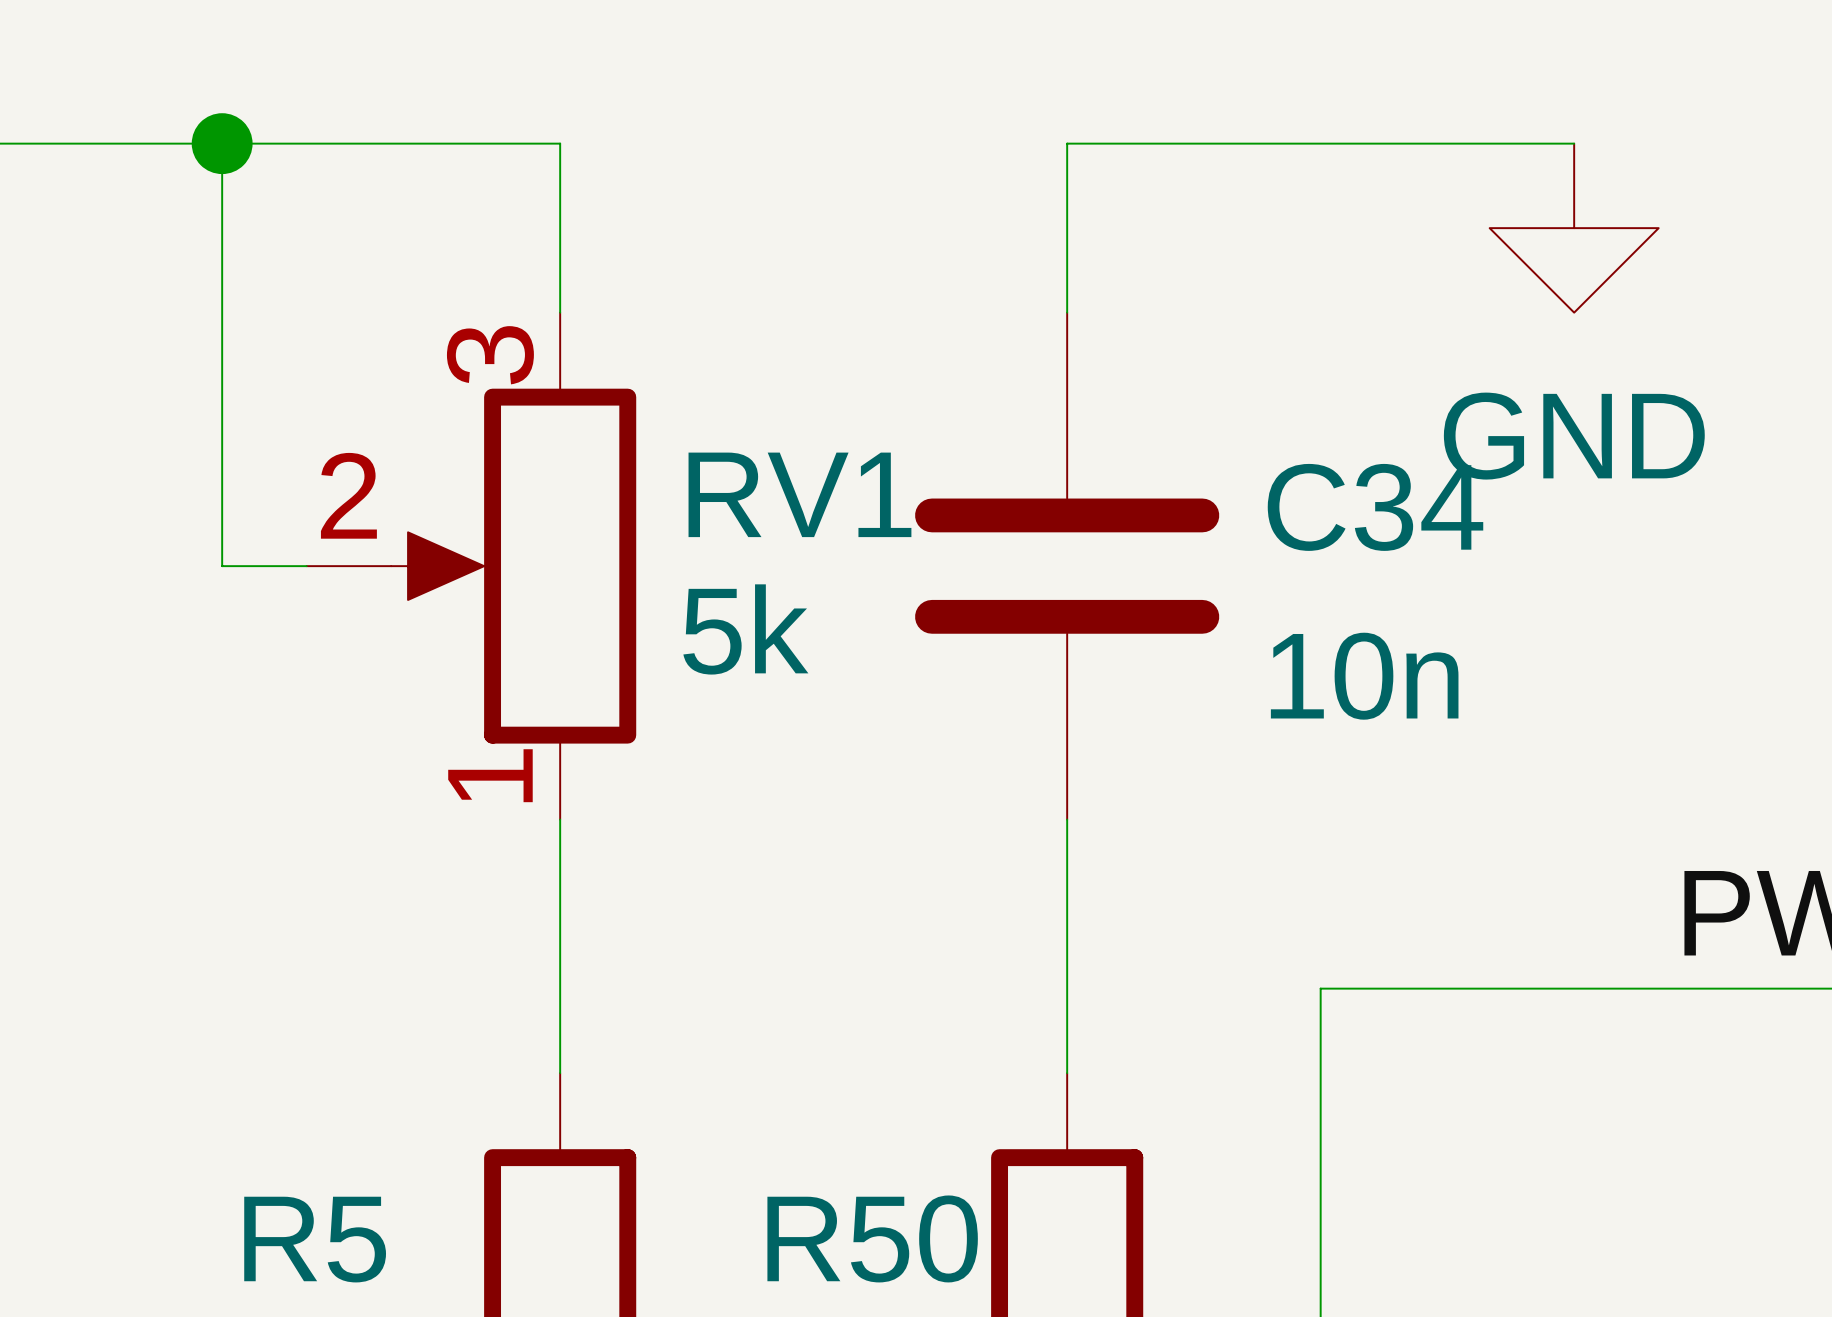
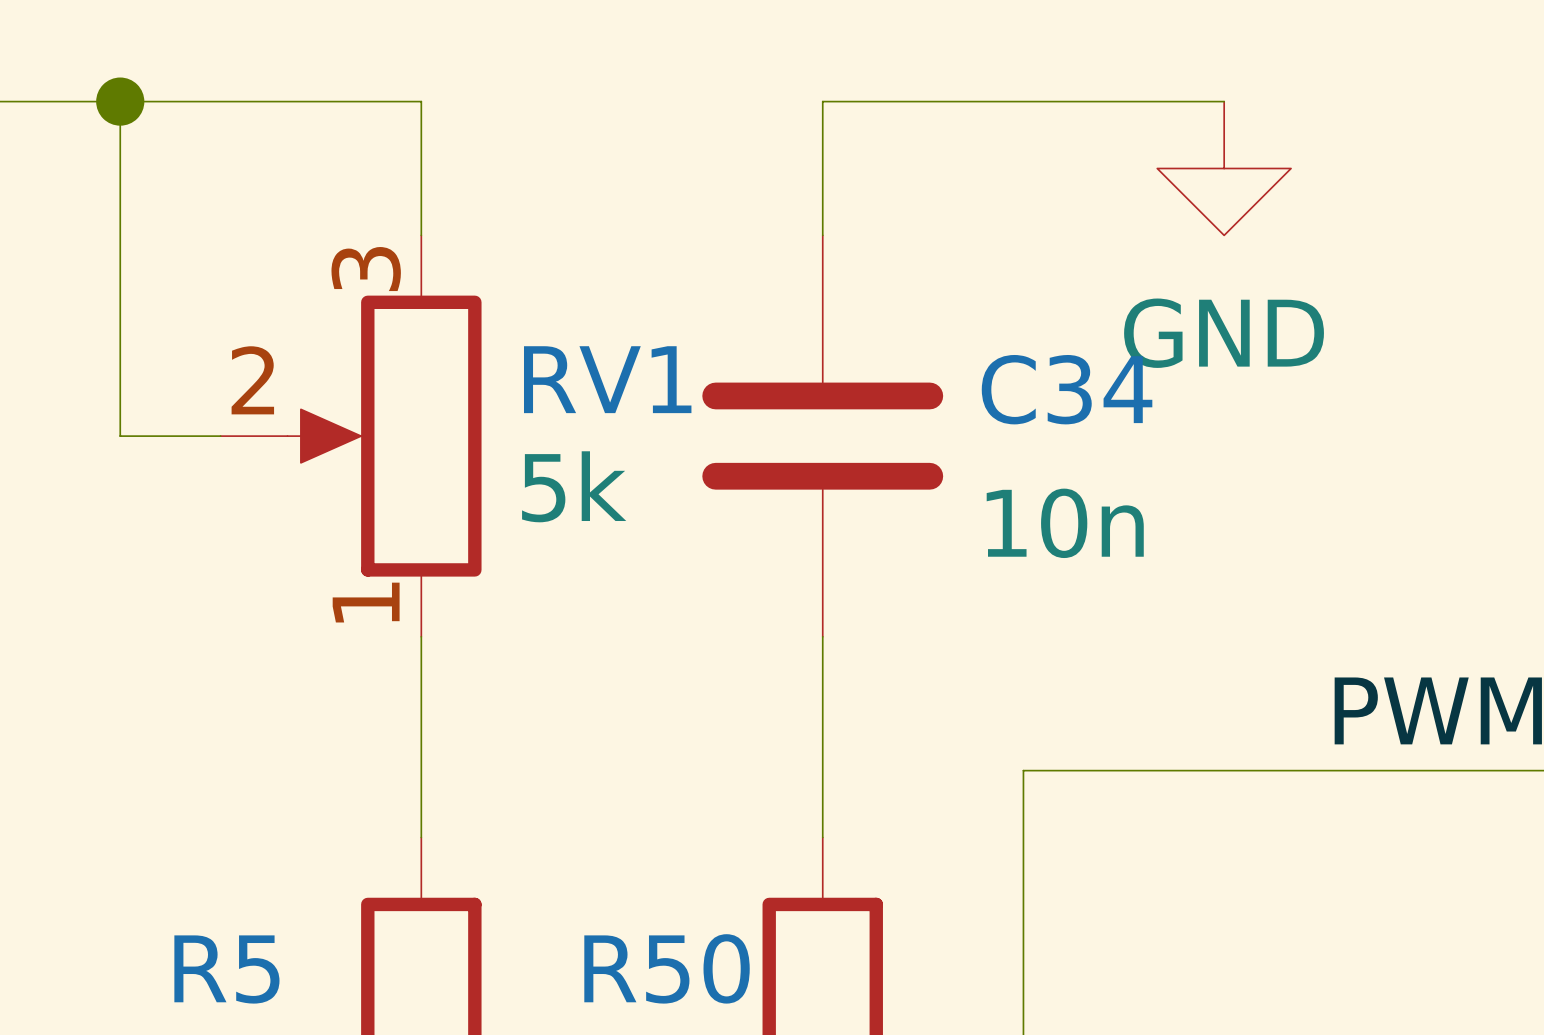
wire: (222, 143) (222, 566) -> (120, 101) (120, 436) (153, 436)
junction position: (222, 143) -> (120, 101)

